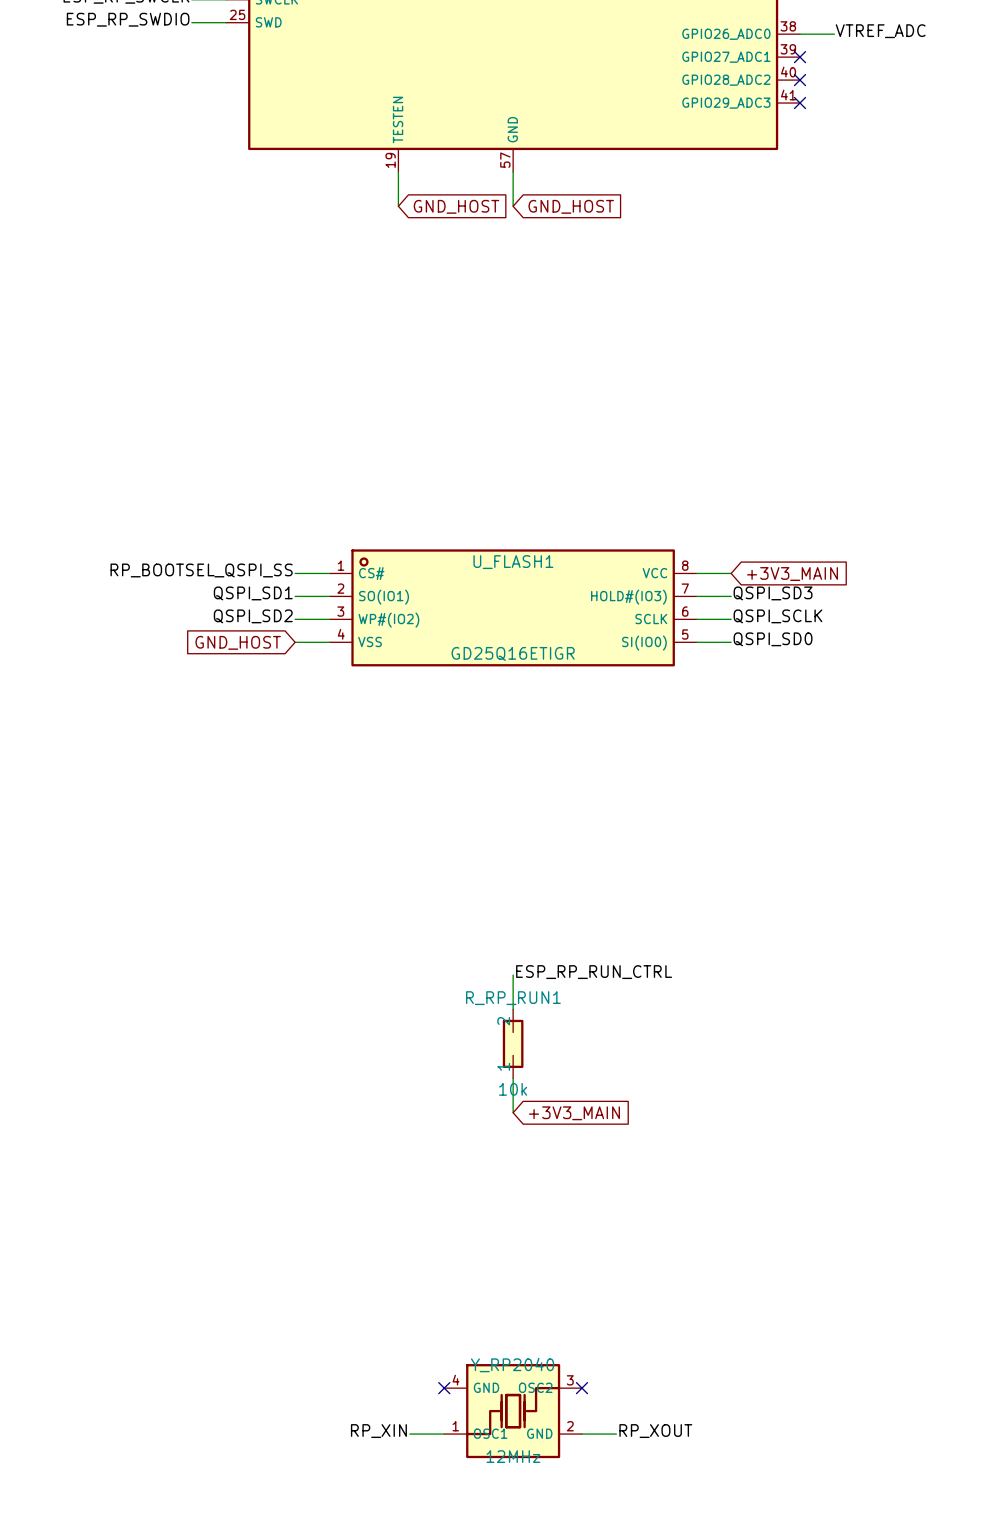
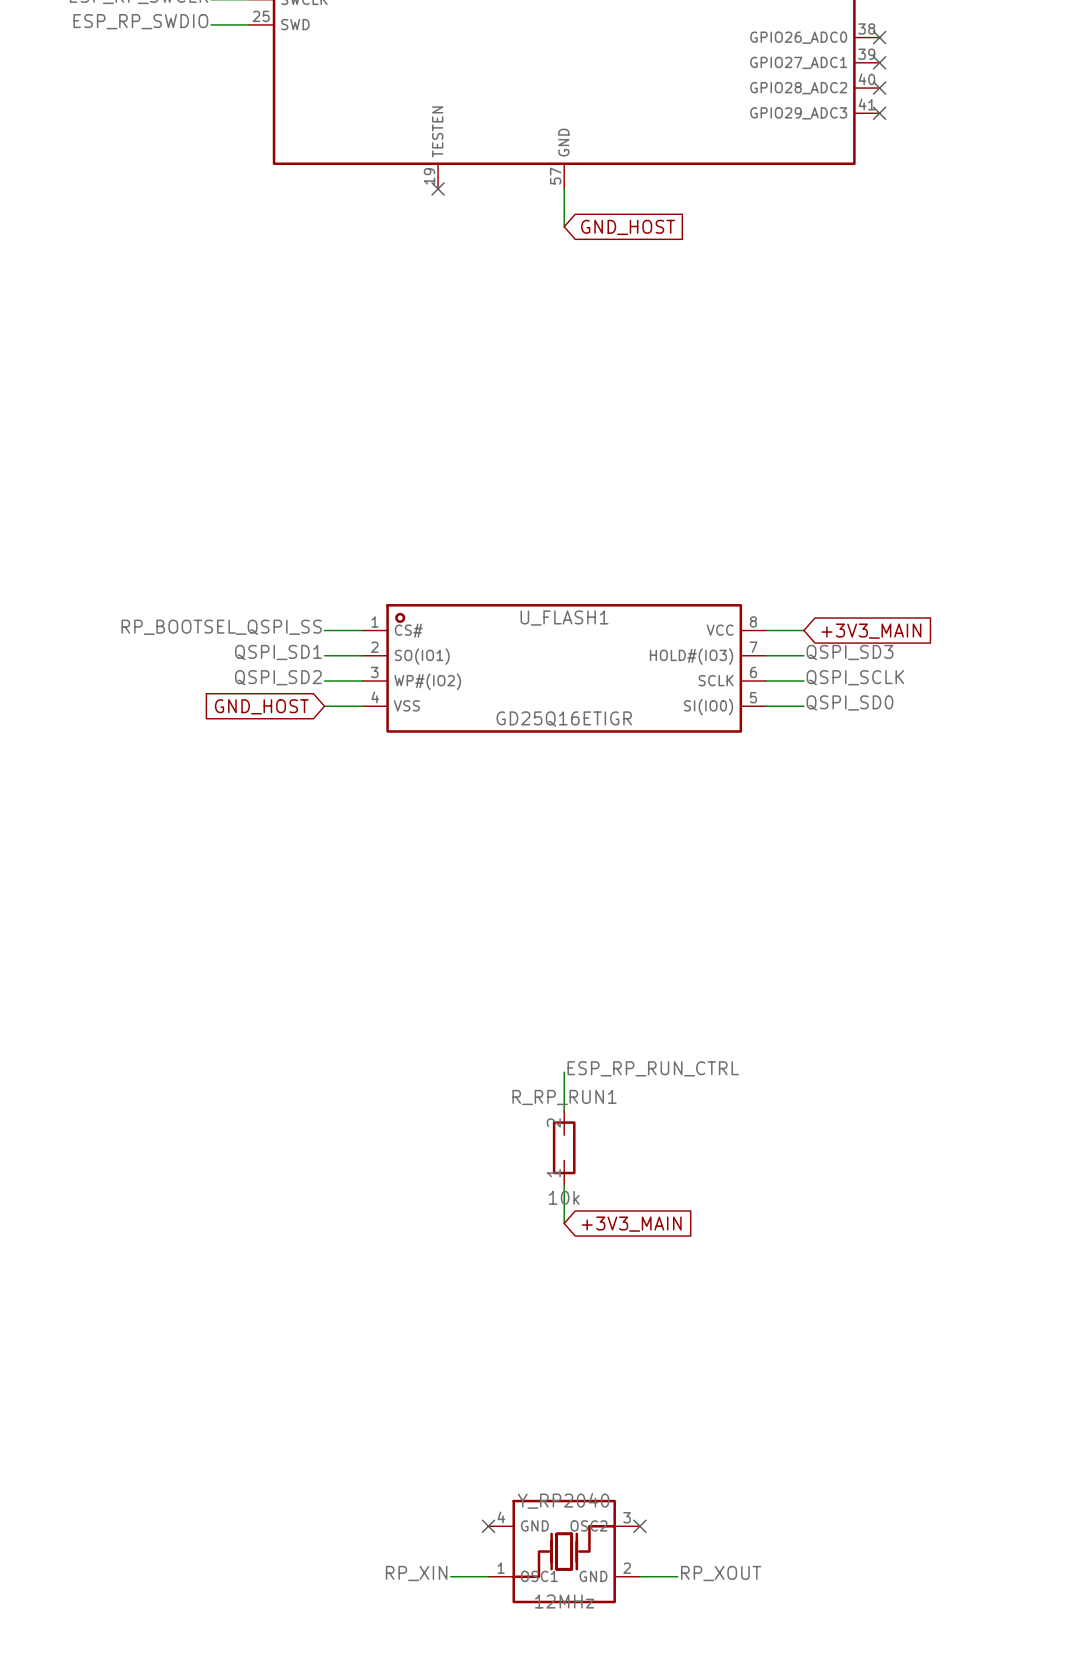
label: VTREF_ADC (880, 31) -> none
wire: (800, 34) (834, 34) -> none
no-connect mark: none -> (879, 37)
wire: (398, 171) (398, 206) -> none
no-connect mark: none -> (438, 188)
global label: GND_HOST (456, 206) -> none

